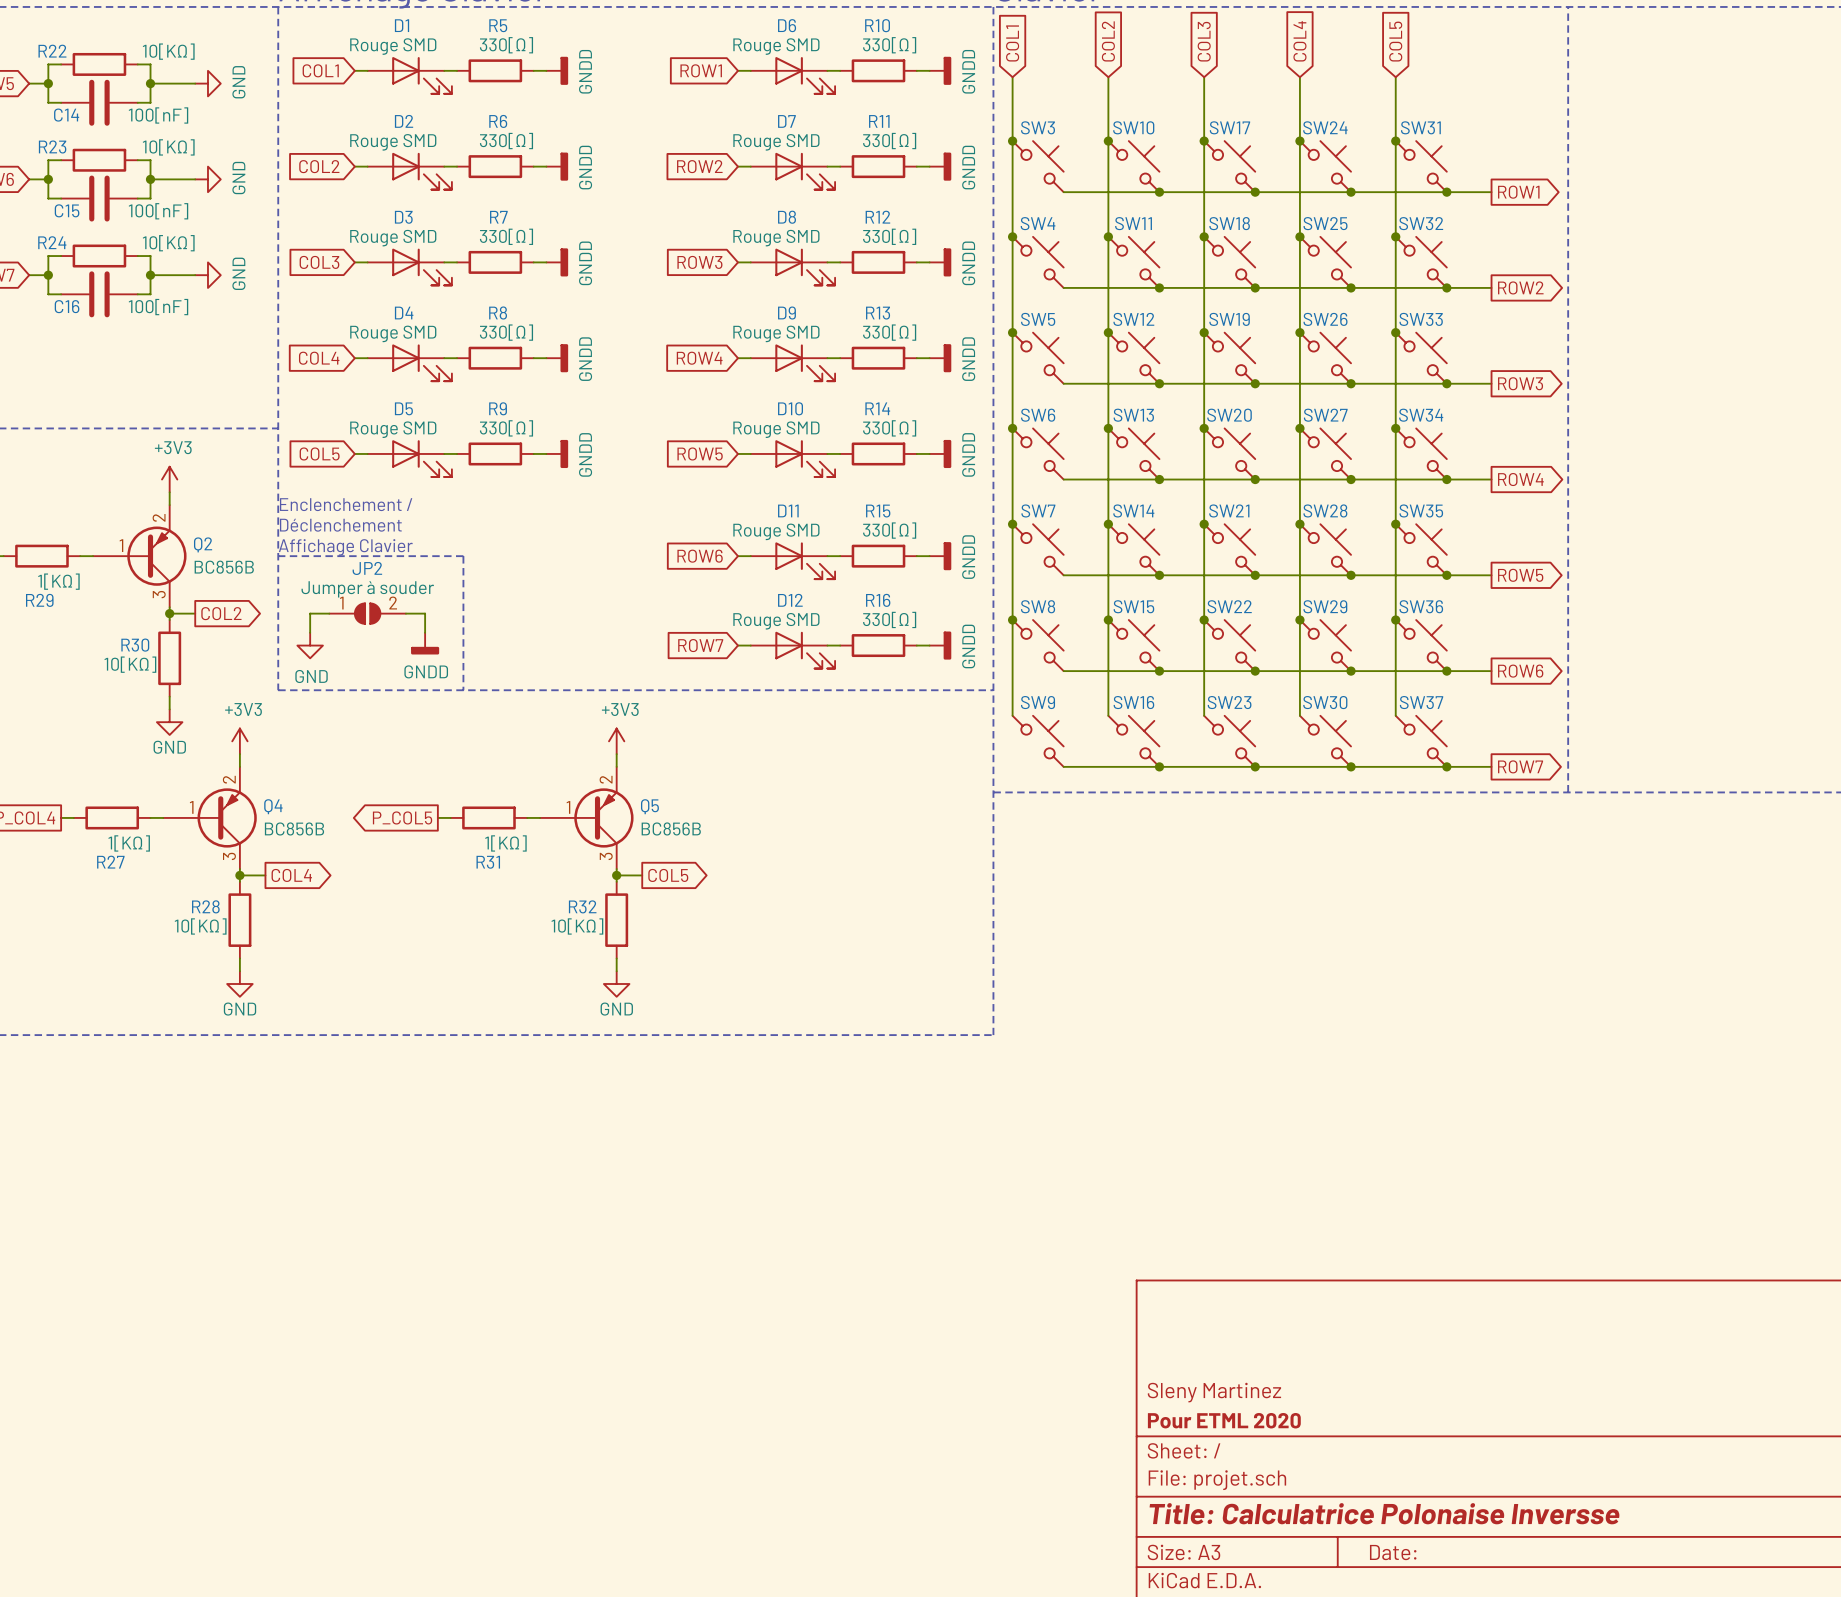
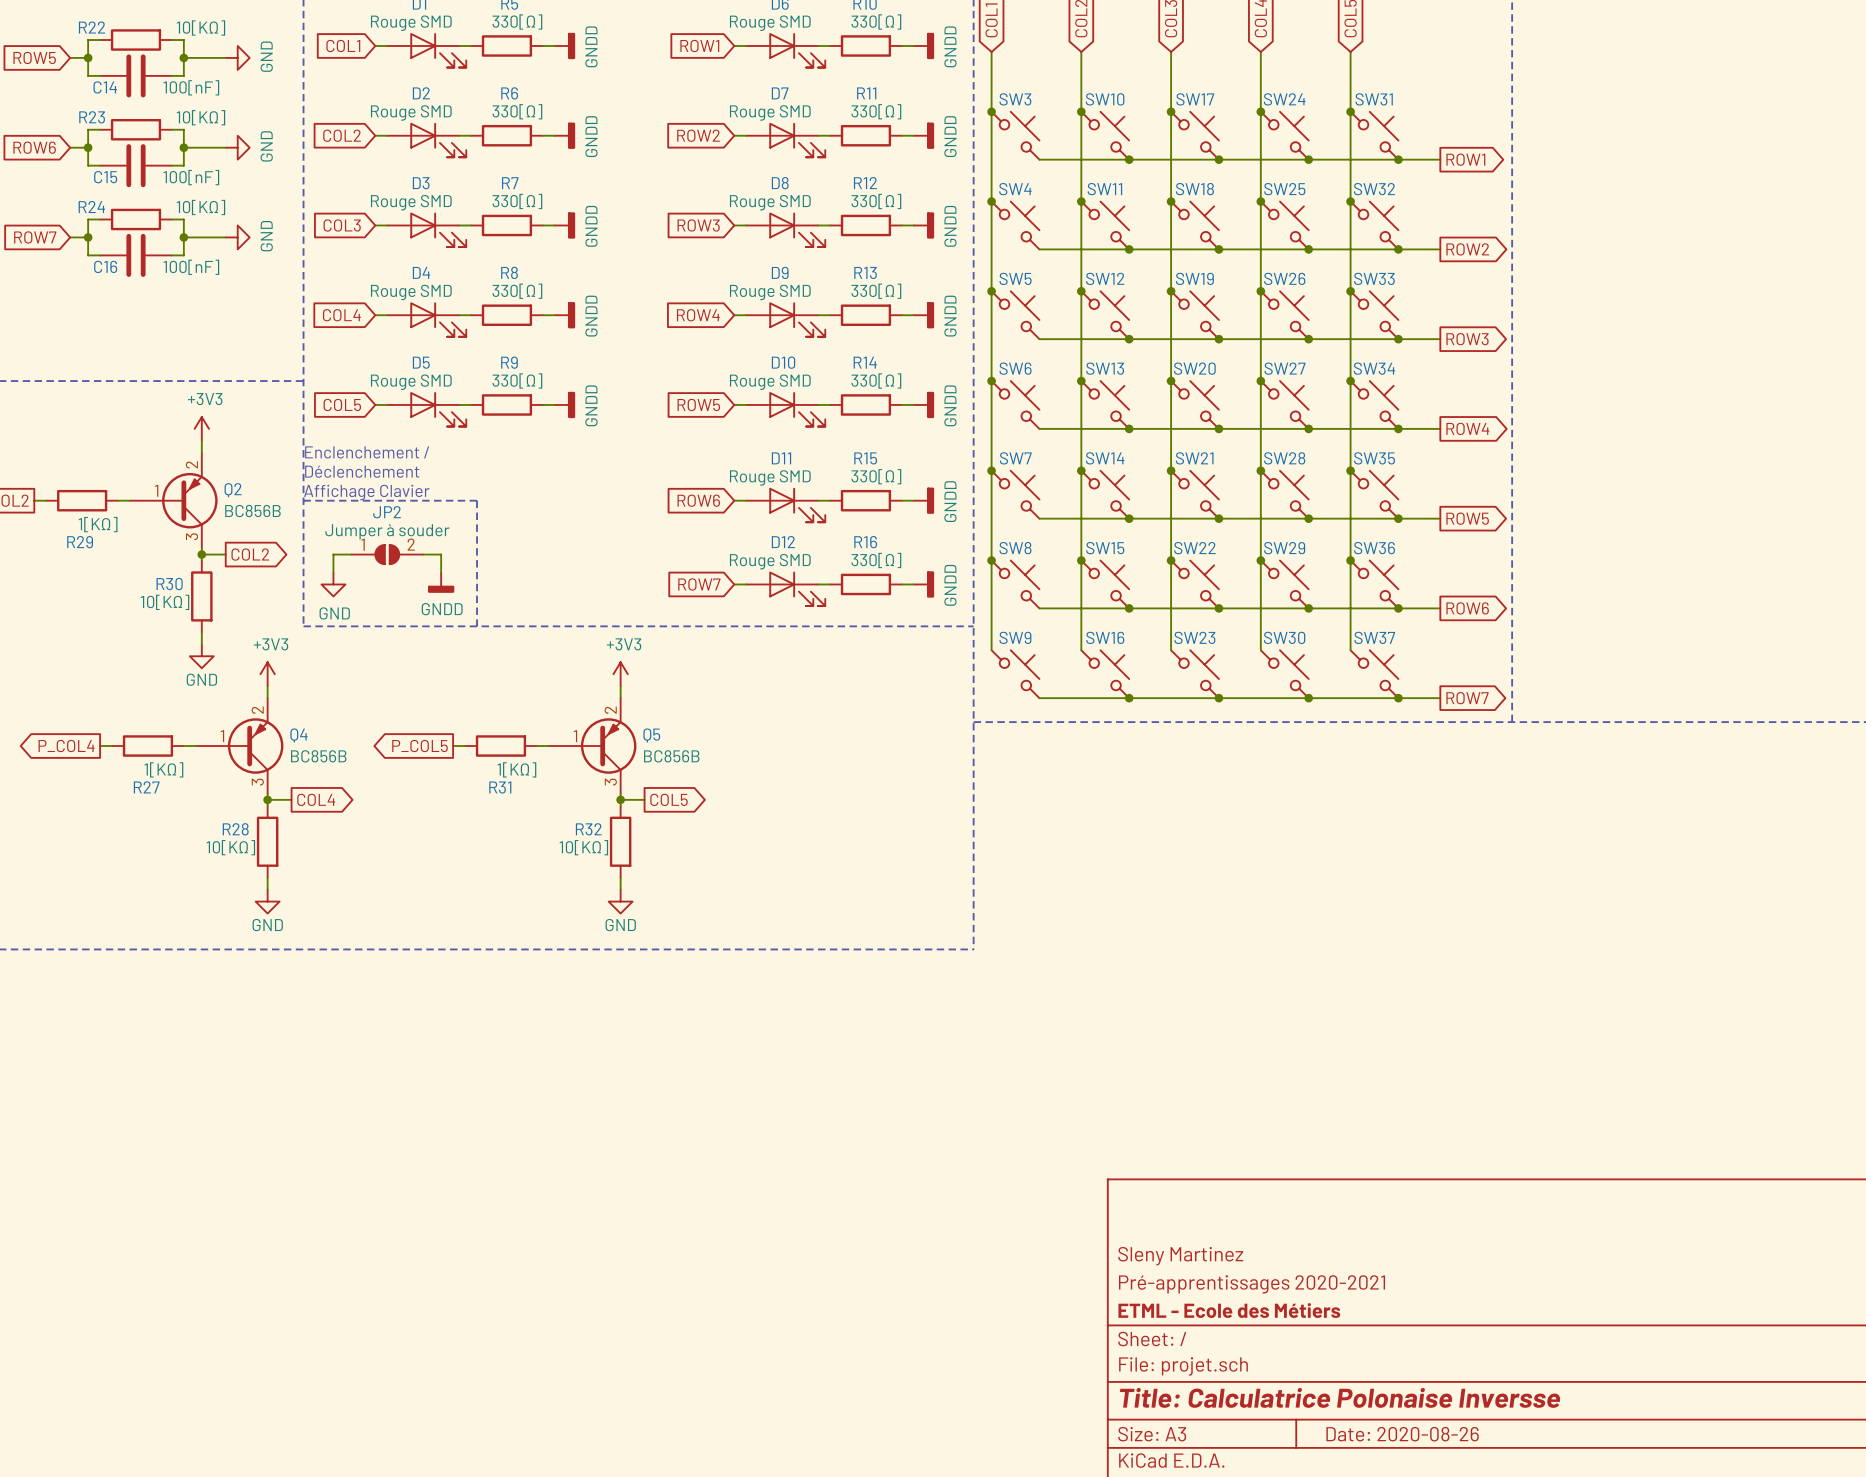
title block: none -> Sleny Martinez (1180, 1256)
title block: Sleny Martinez (1214, 1392) -> Pré-apprentissages 2020-2021 (1252, 1284)
title block: Pour ETML 2020 (1224, 1420) -> ETML - Ecole des Métiers (1229, 1310)
title block: Date: (1393, 1552) -> Date: 2020-08-26 (1402, 1434)

